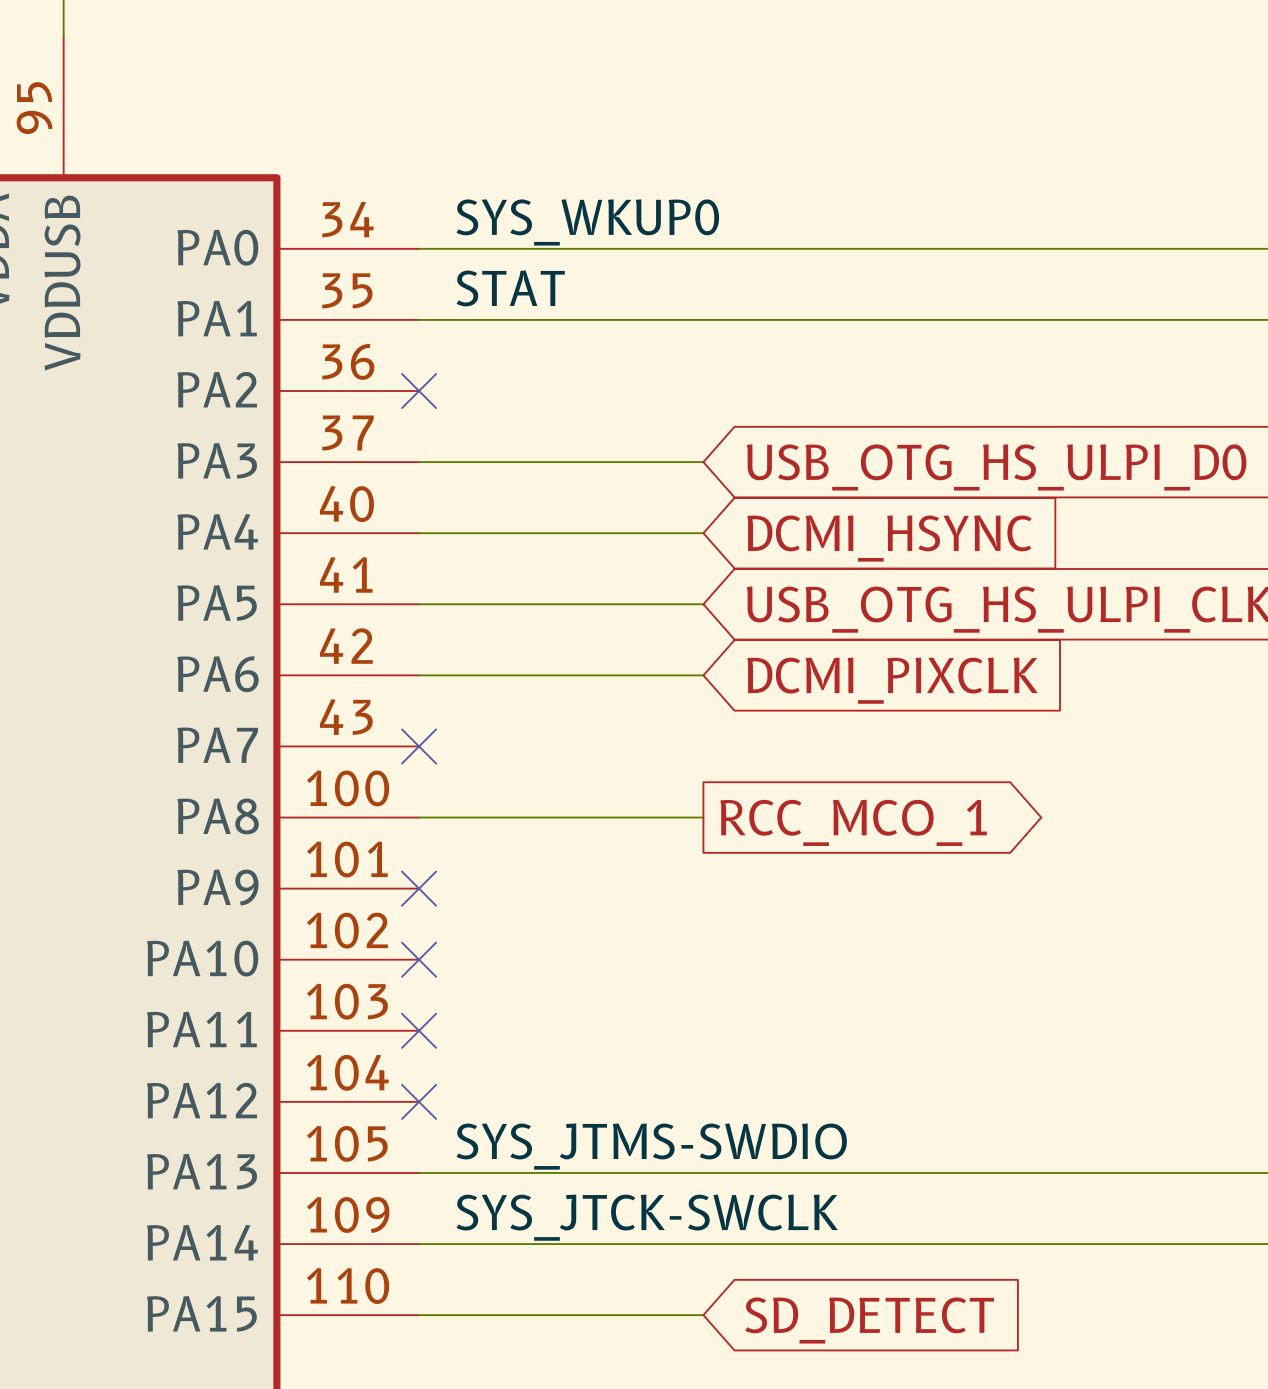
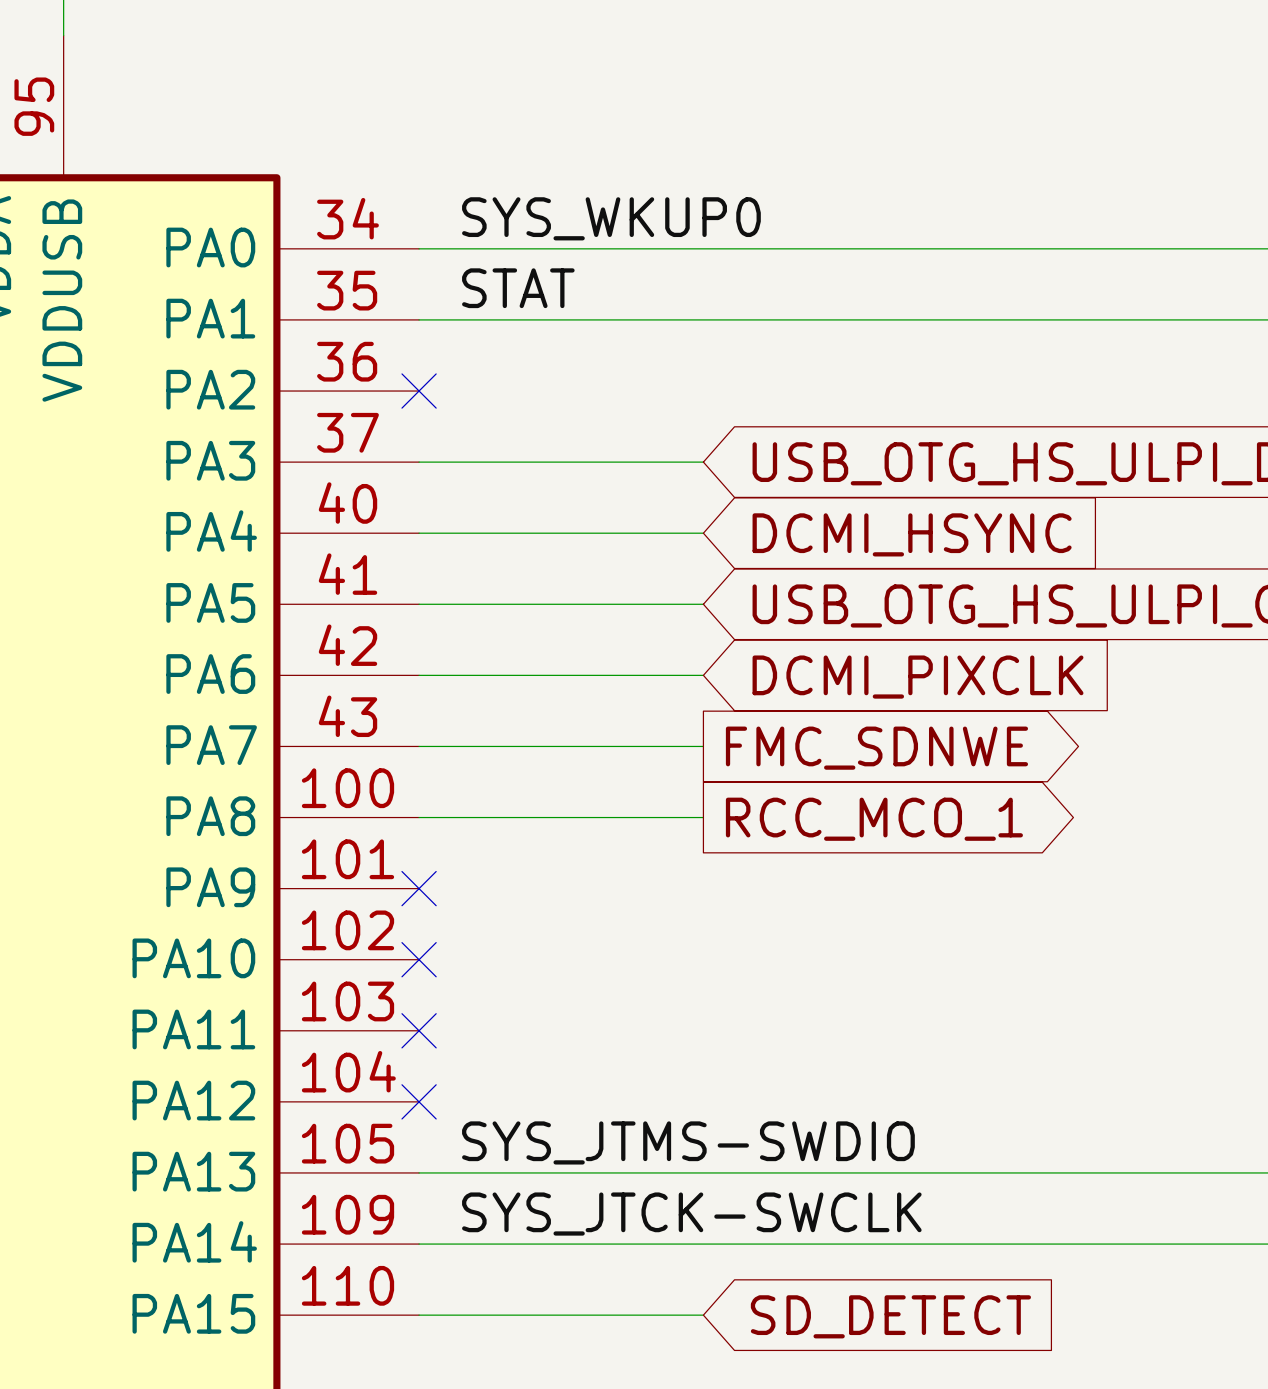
wire: none -> (419, 746) (703, 746)
no-connect mark: (419, 746) -> none
global label: none -> FMC_SDNWE (876, 748)

